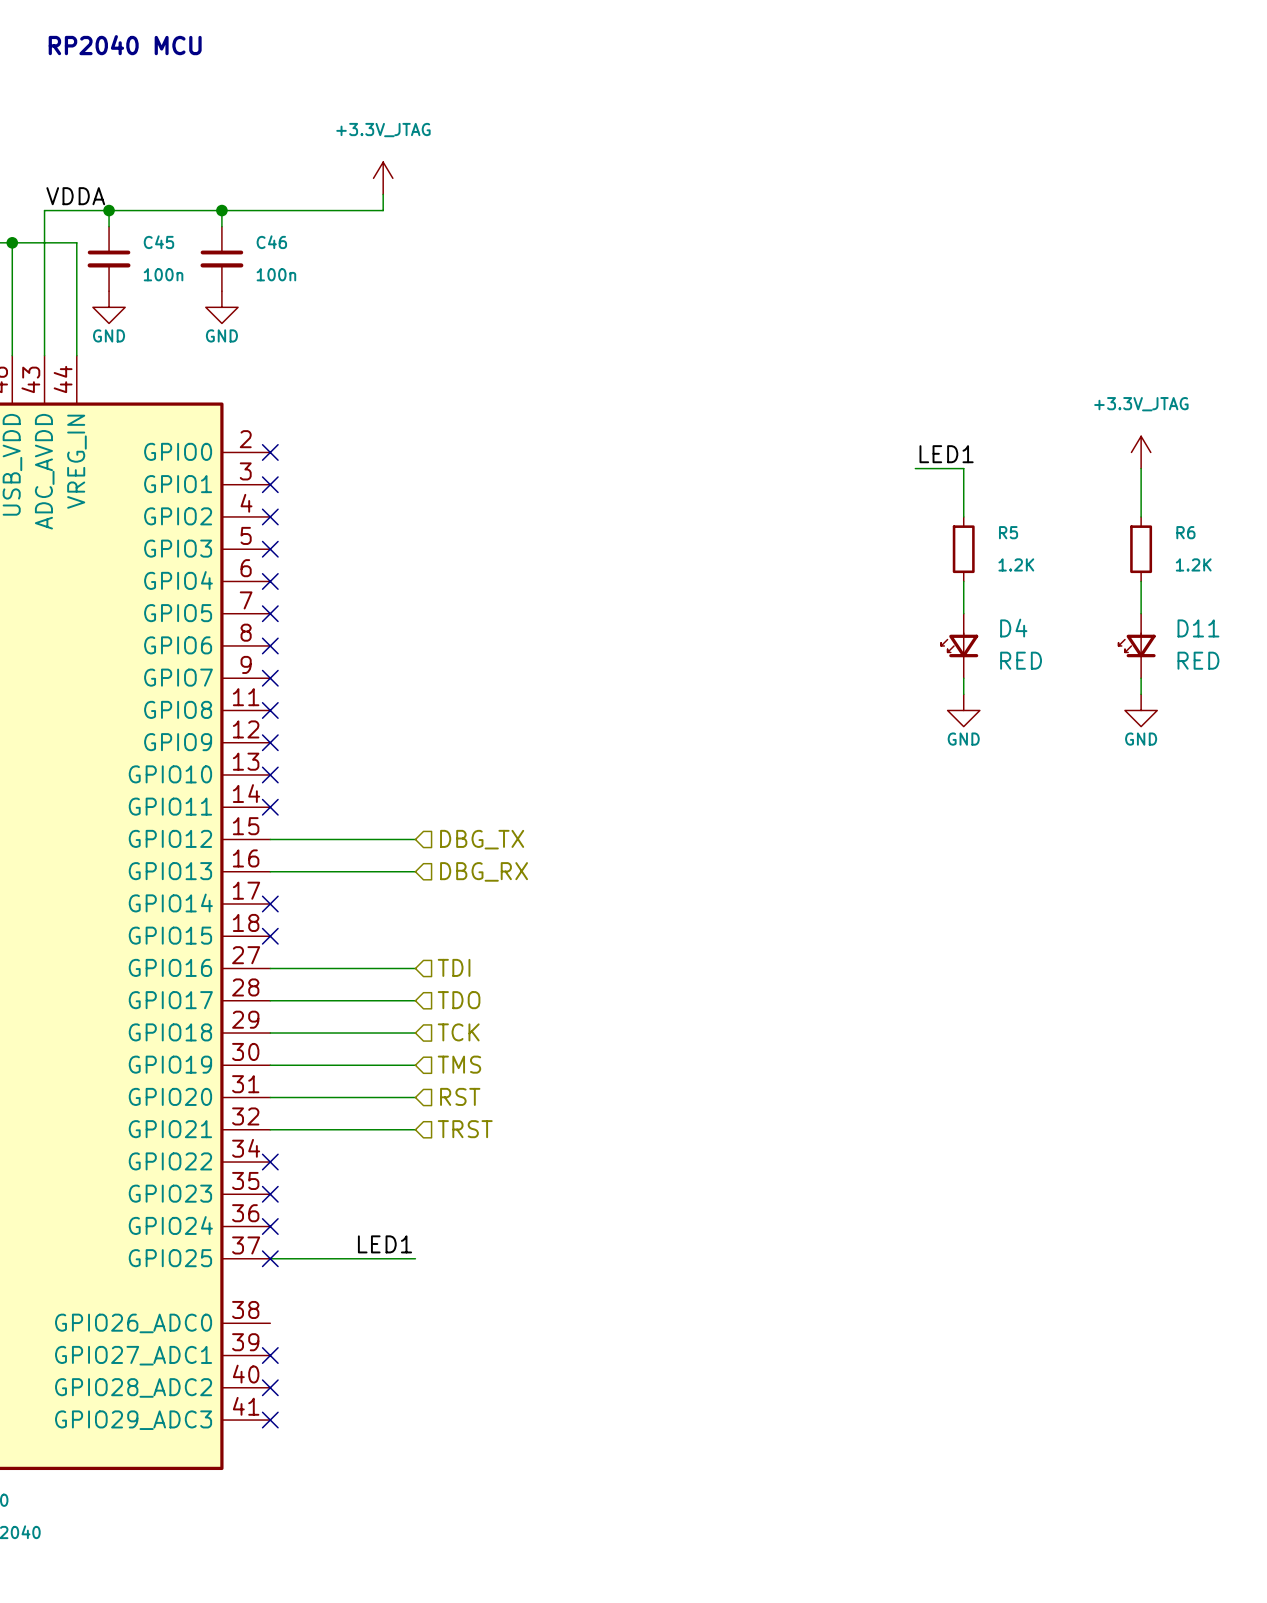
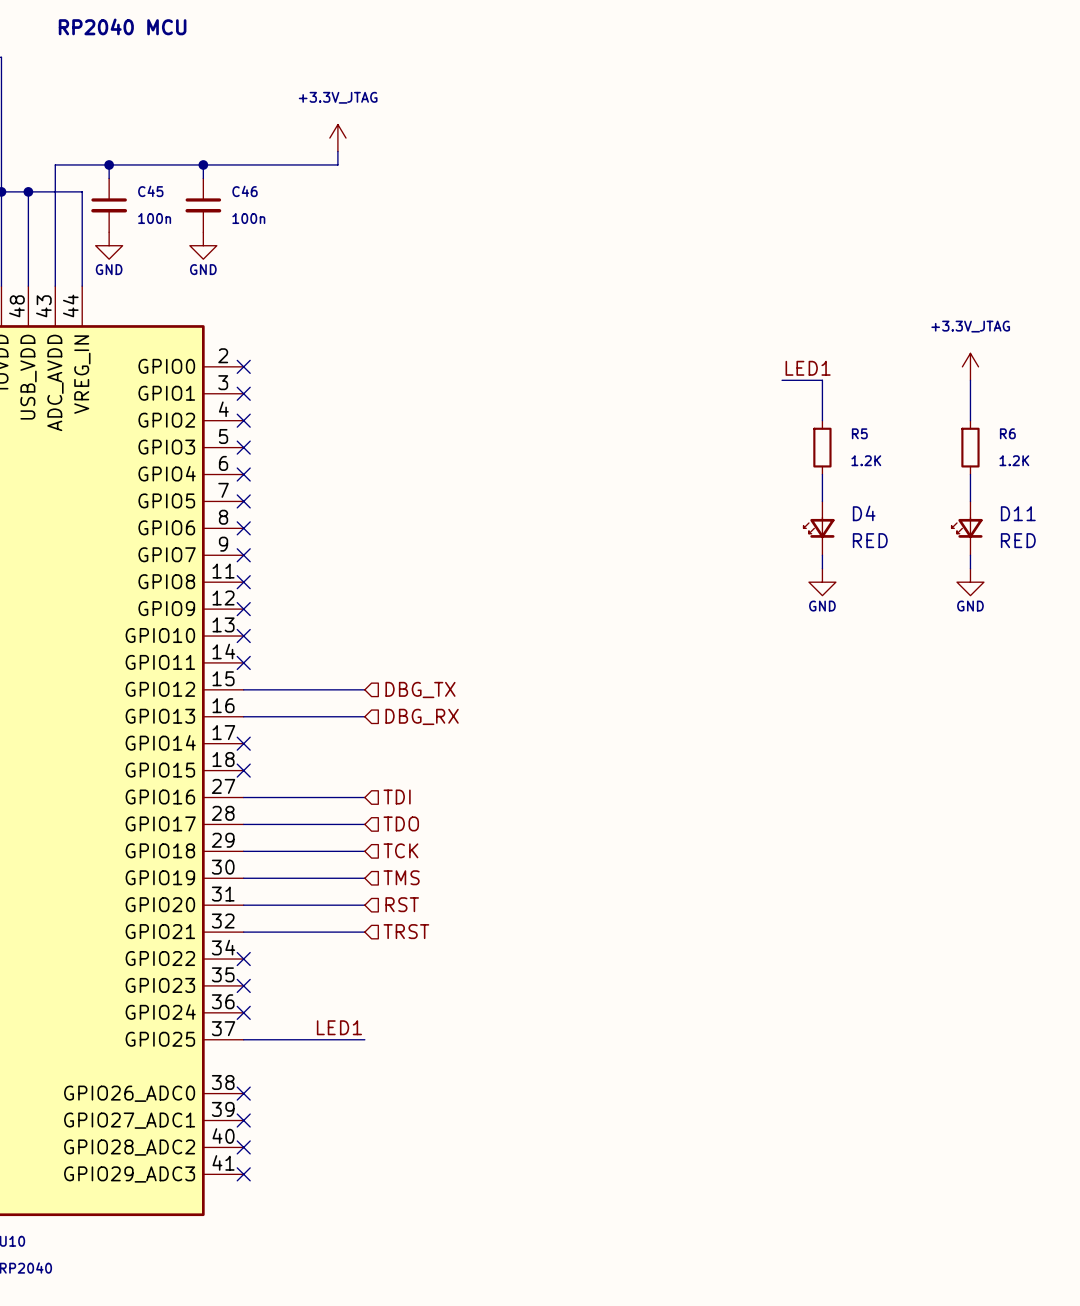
label: VDDA (75, 196) -> none
no-connect mark position: (270, 1258) -> (243, 1093)

